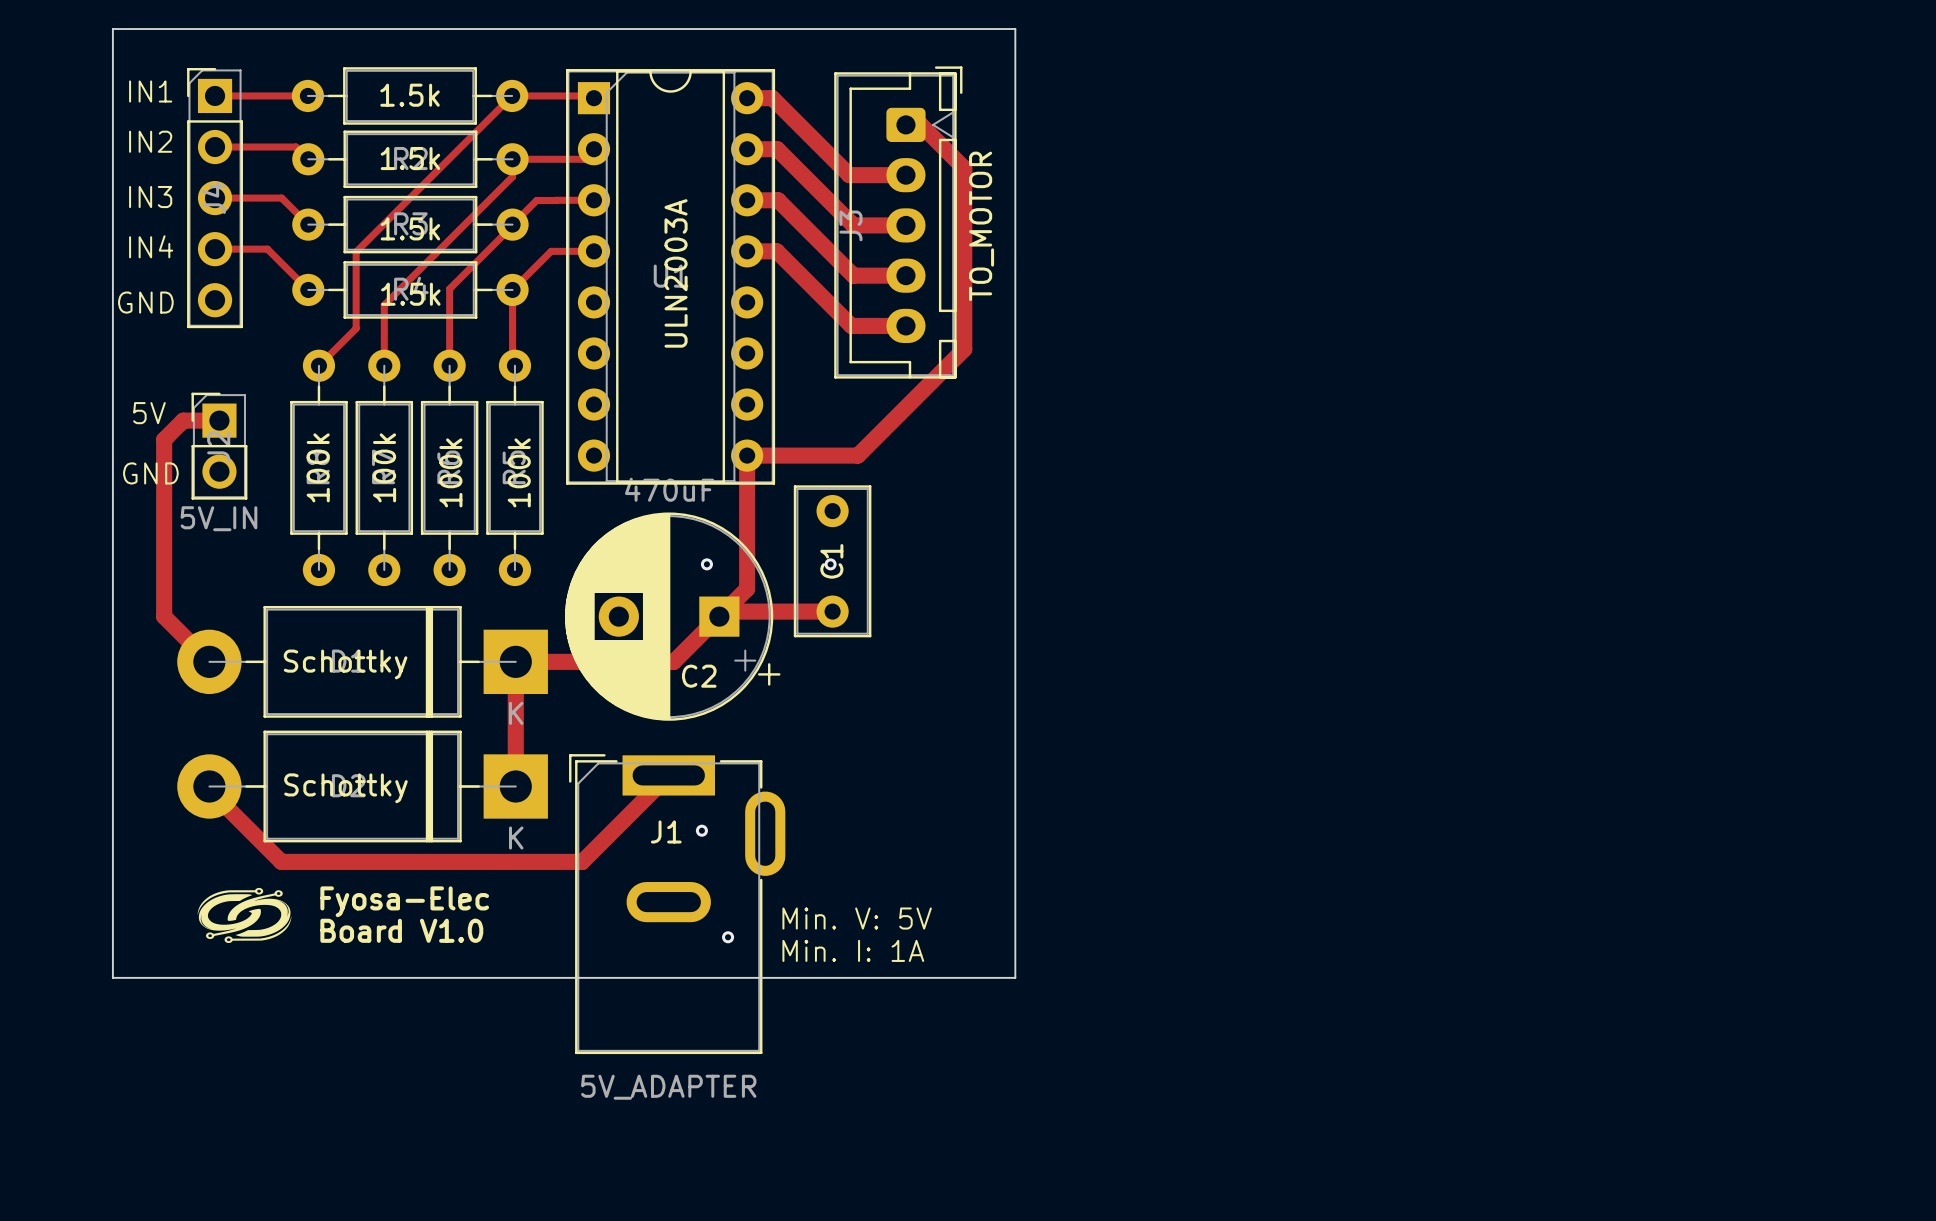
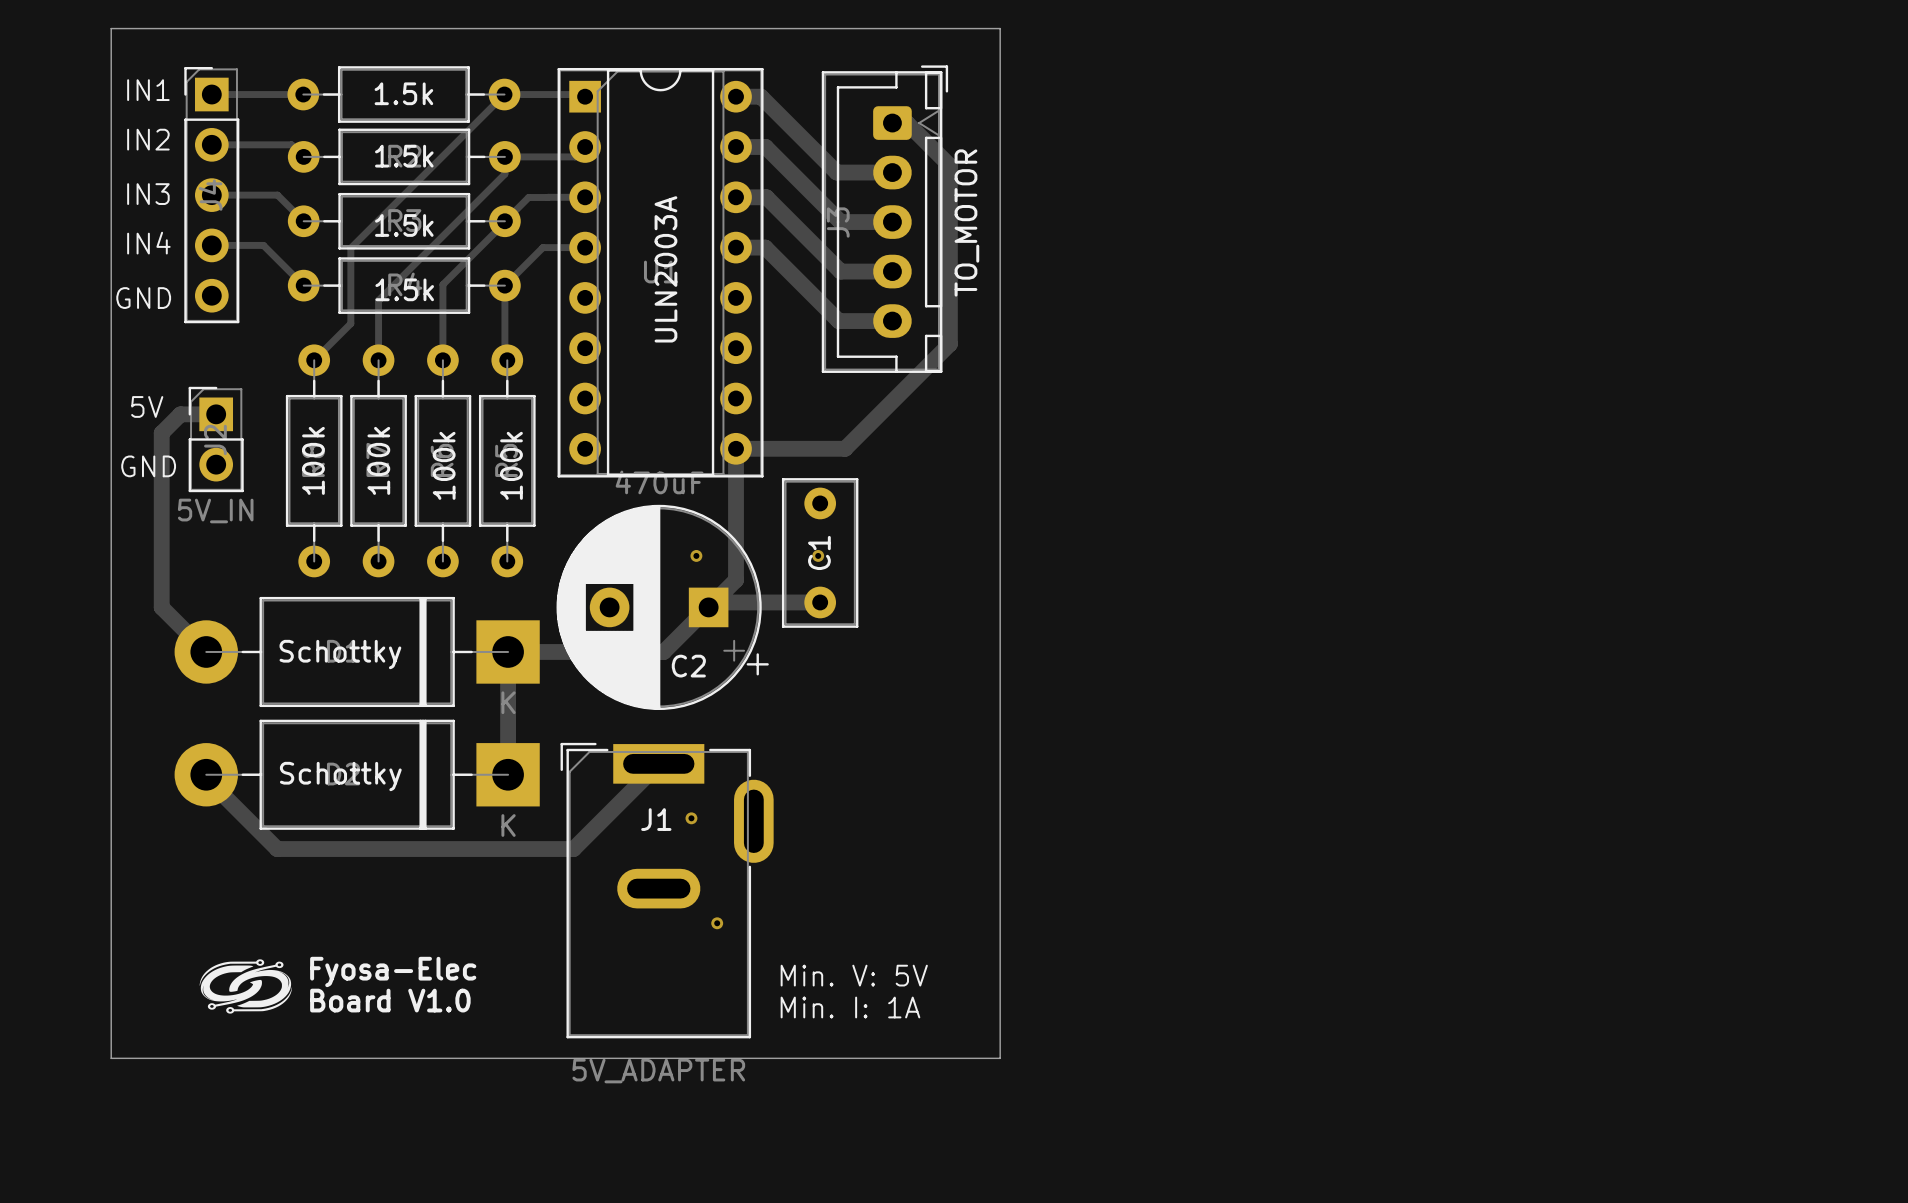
text position: Fyosa-Elec (404, 901) -> Fyosa-Elec (393, 971)
drawing position: (244, 915) -> (245, 986)
text position: Min. V: 5V (857, 918) -> Min. V: 5V (854, 975)
text position: Board V1.0 (401, 930) -> Board V1.0 (390, 1000)
text position: Min. I: 1A (853, 950) -> Min. I: 1A (850, 1007)
board edge: (112, 977) (1015, 977) -> (111, 963) (111, 1058) (1000, 1058) (1000, 963)

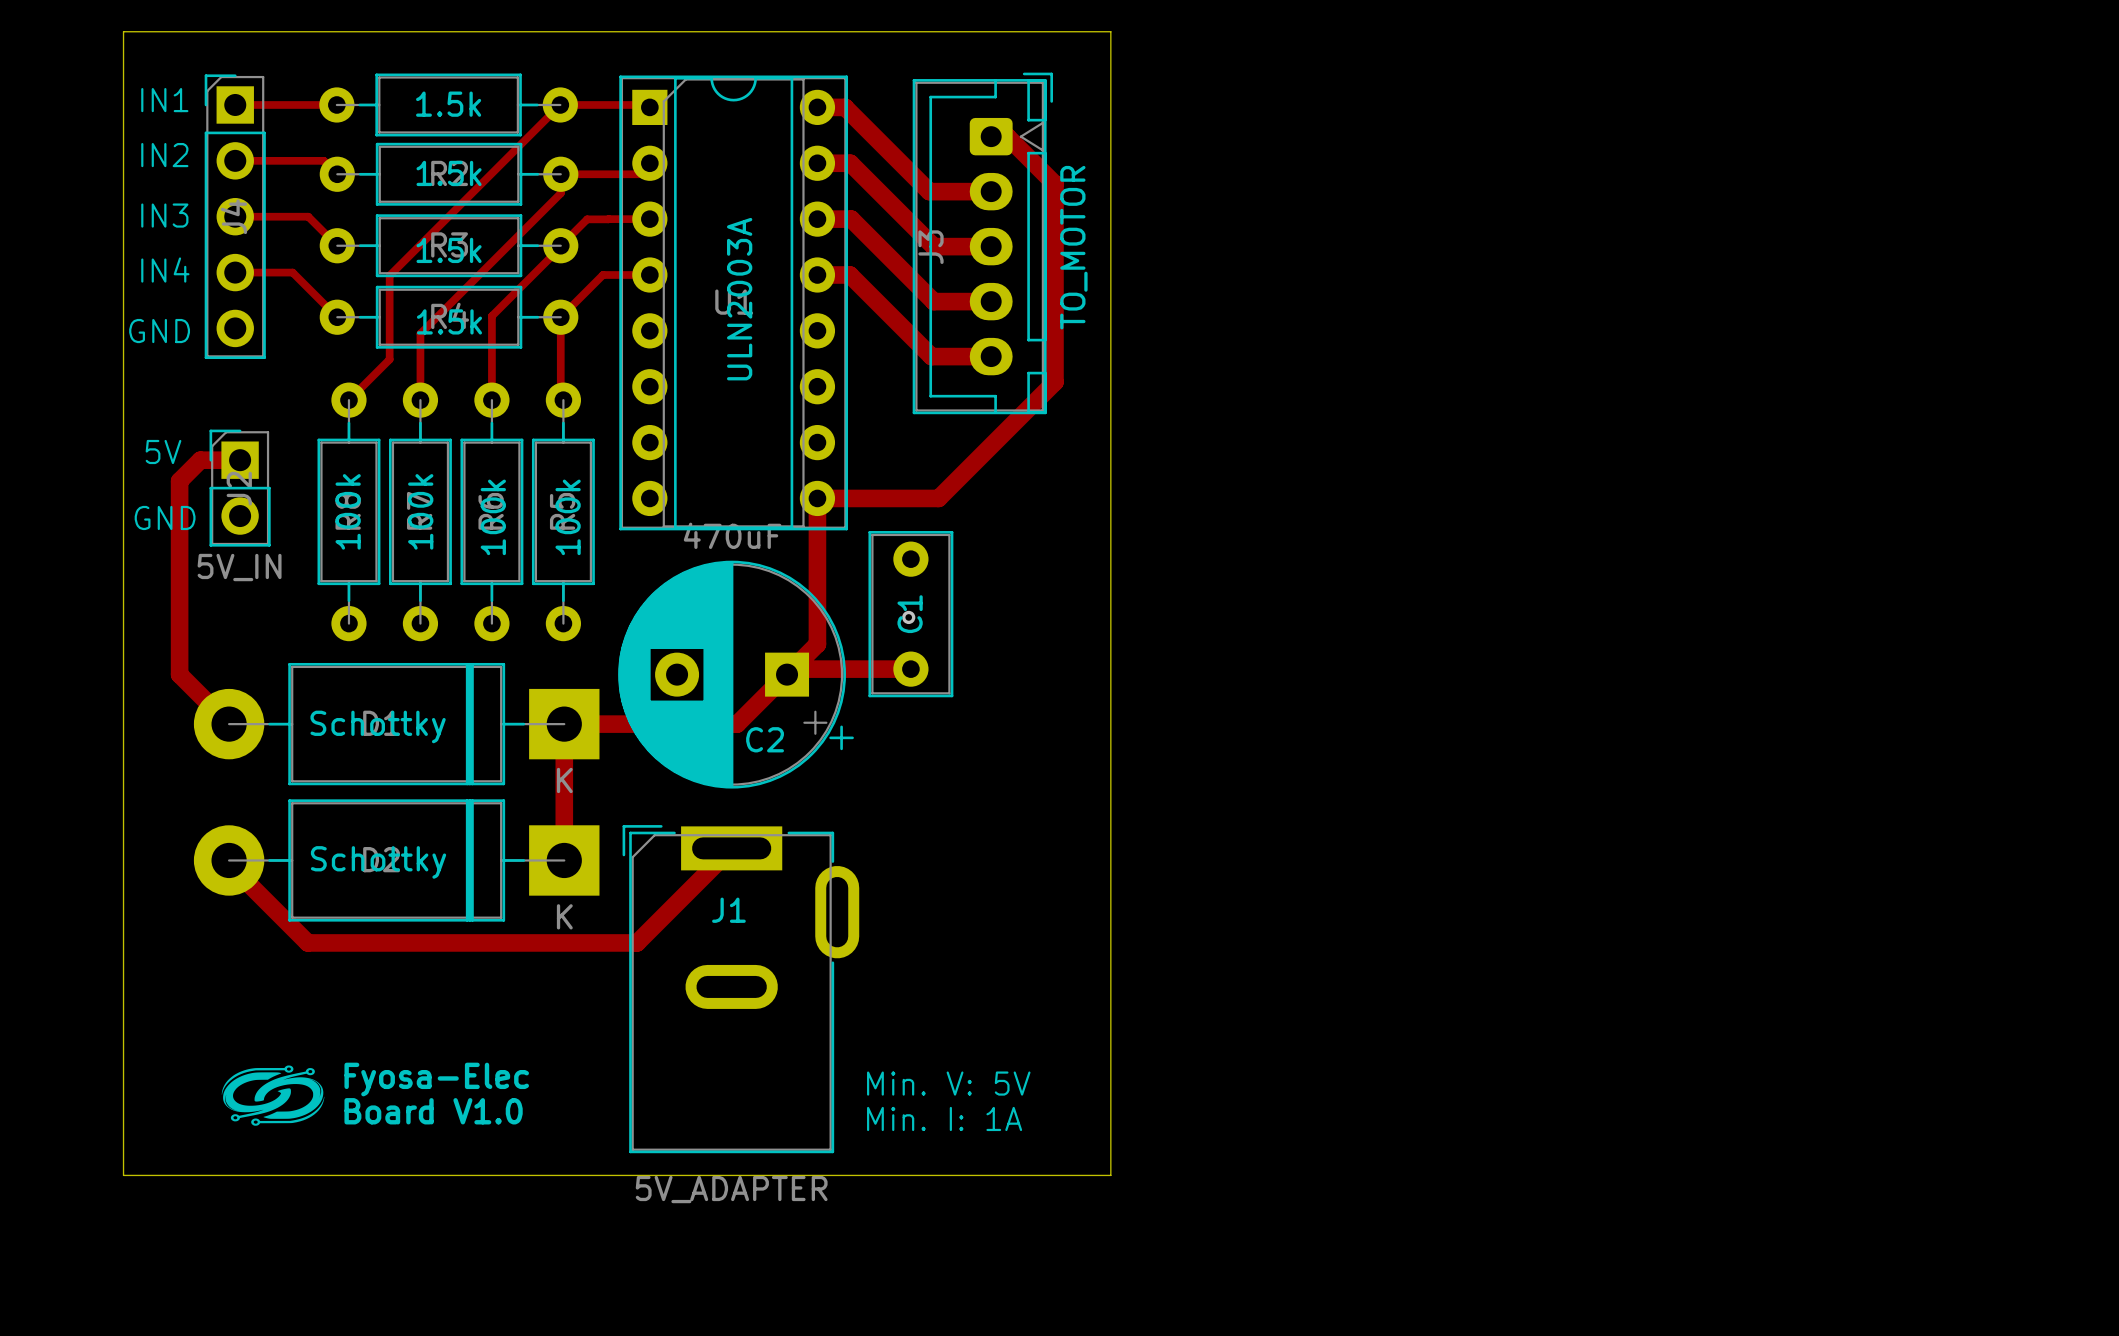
via: (696, 555) -> none
via: (691, 818) -> none
via: (717, 923) -> none

